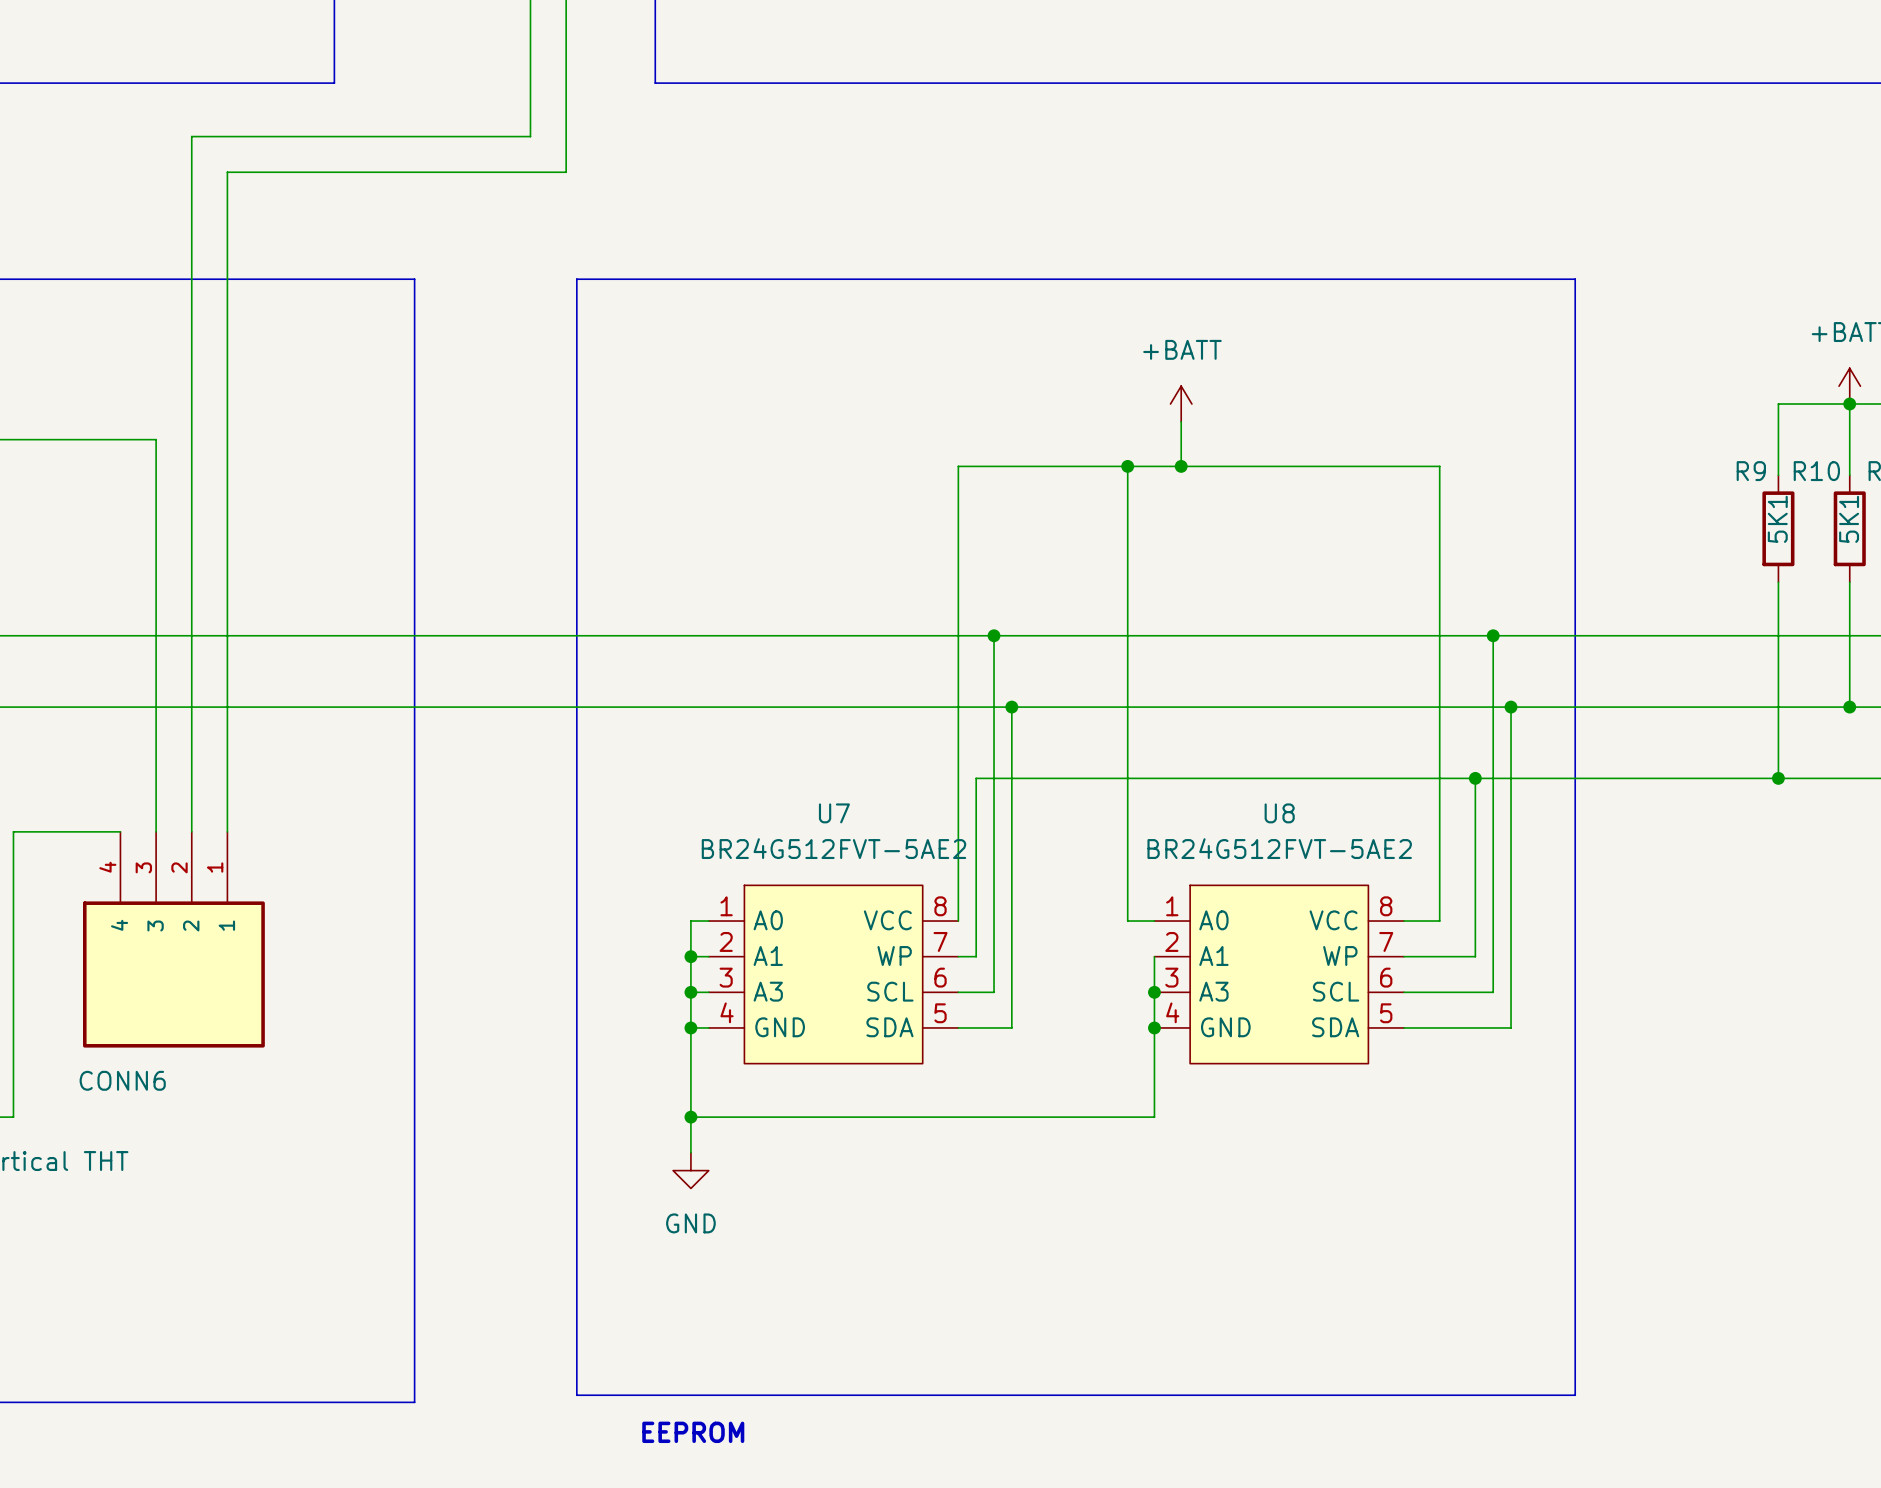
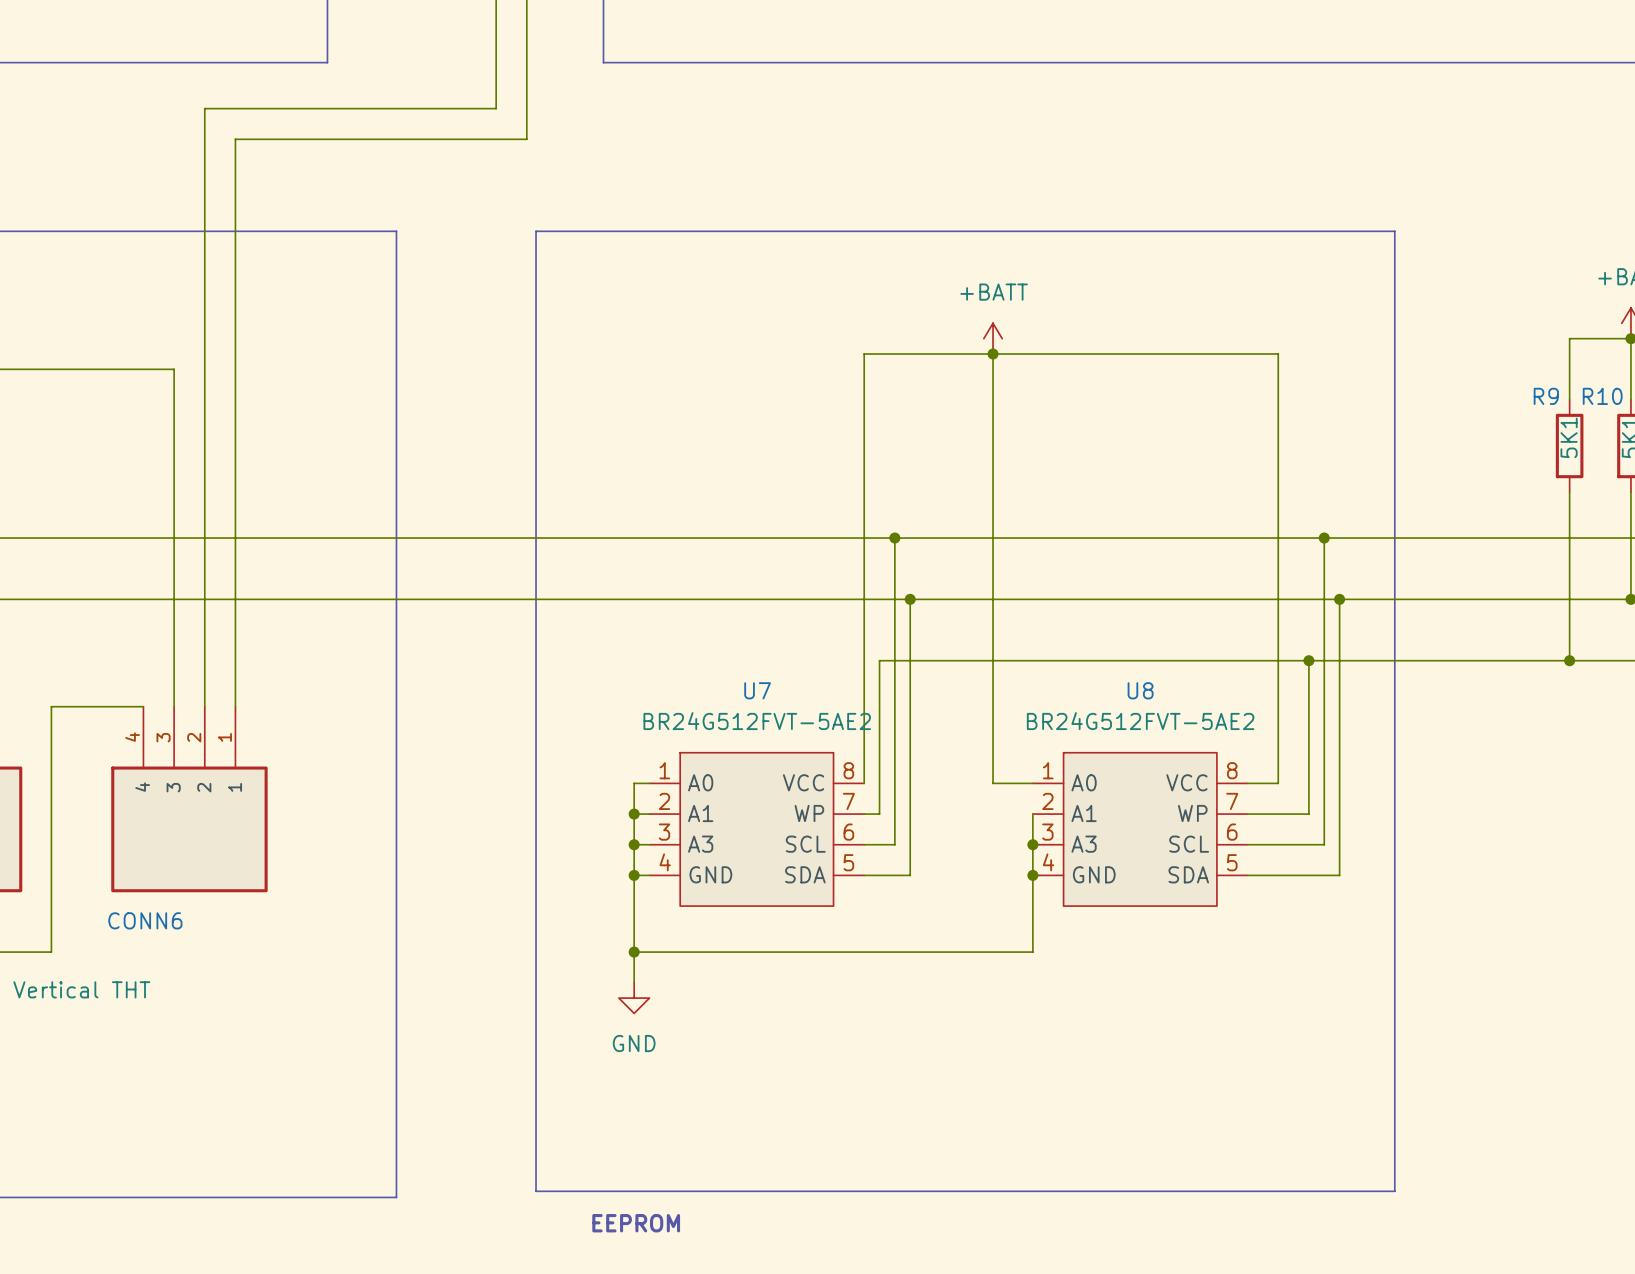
power symbol position: +BATT (1181, 404) -> +BATT (993, 338)
junction: none -> (993, 354)
wire: (1181, 421) (1181, 466) -> none
wire: (958, 466) (1439, 466) -> (864, 392) (864, 354) (1278, 354) (1278, 392)
wire: (1127, 466) (1127, 921) -> (993, 354) (993, 783) (1009, 783)
junction: (1127, 466) -> none
junction: (1181, 466) -> none

